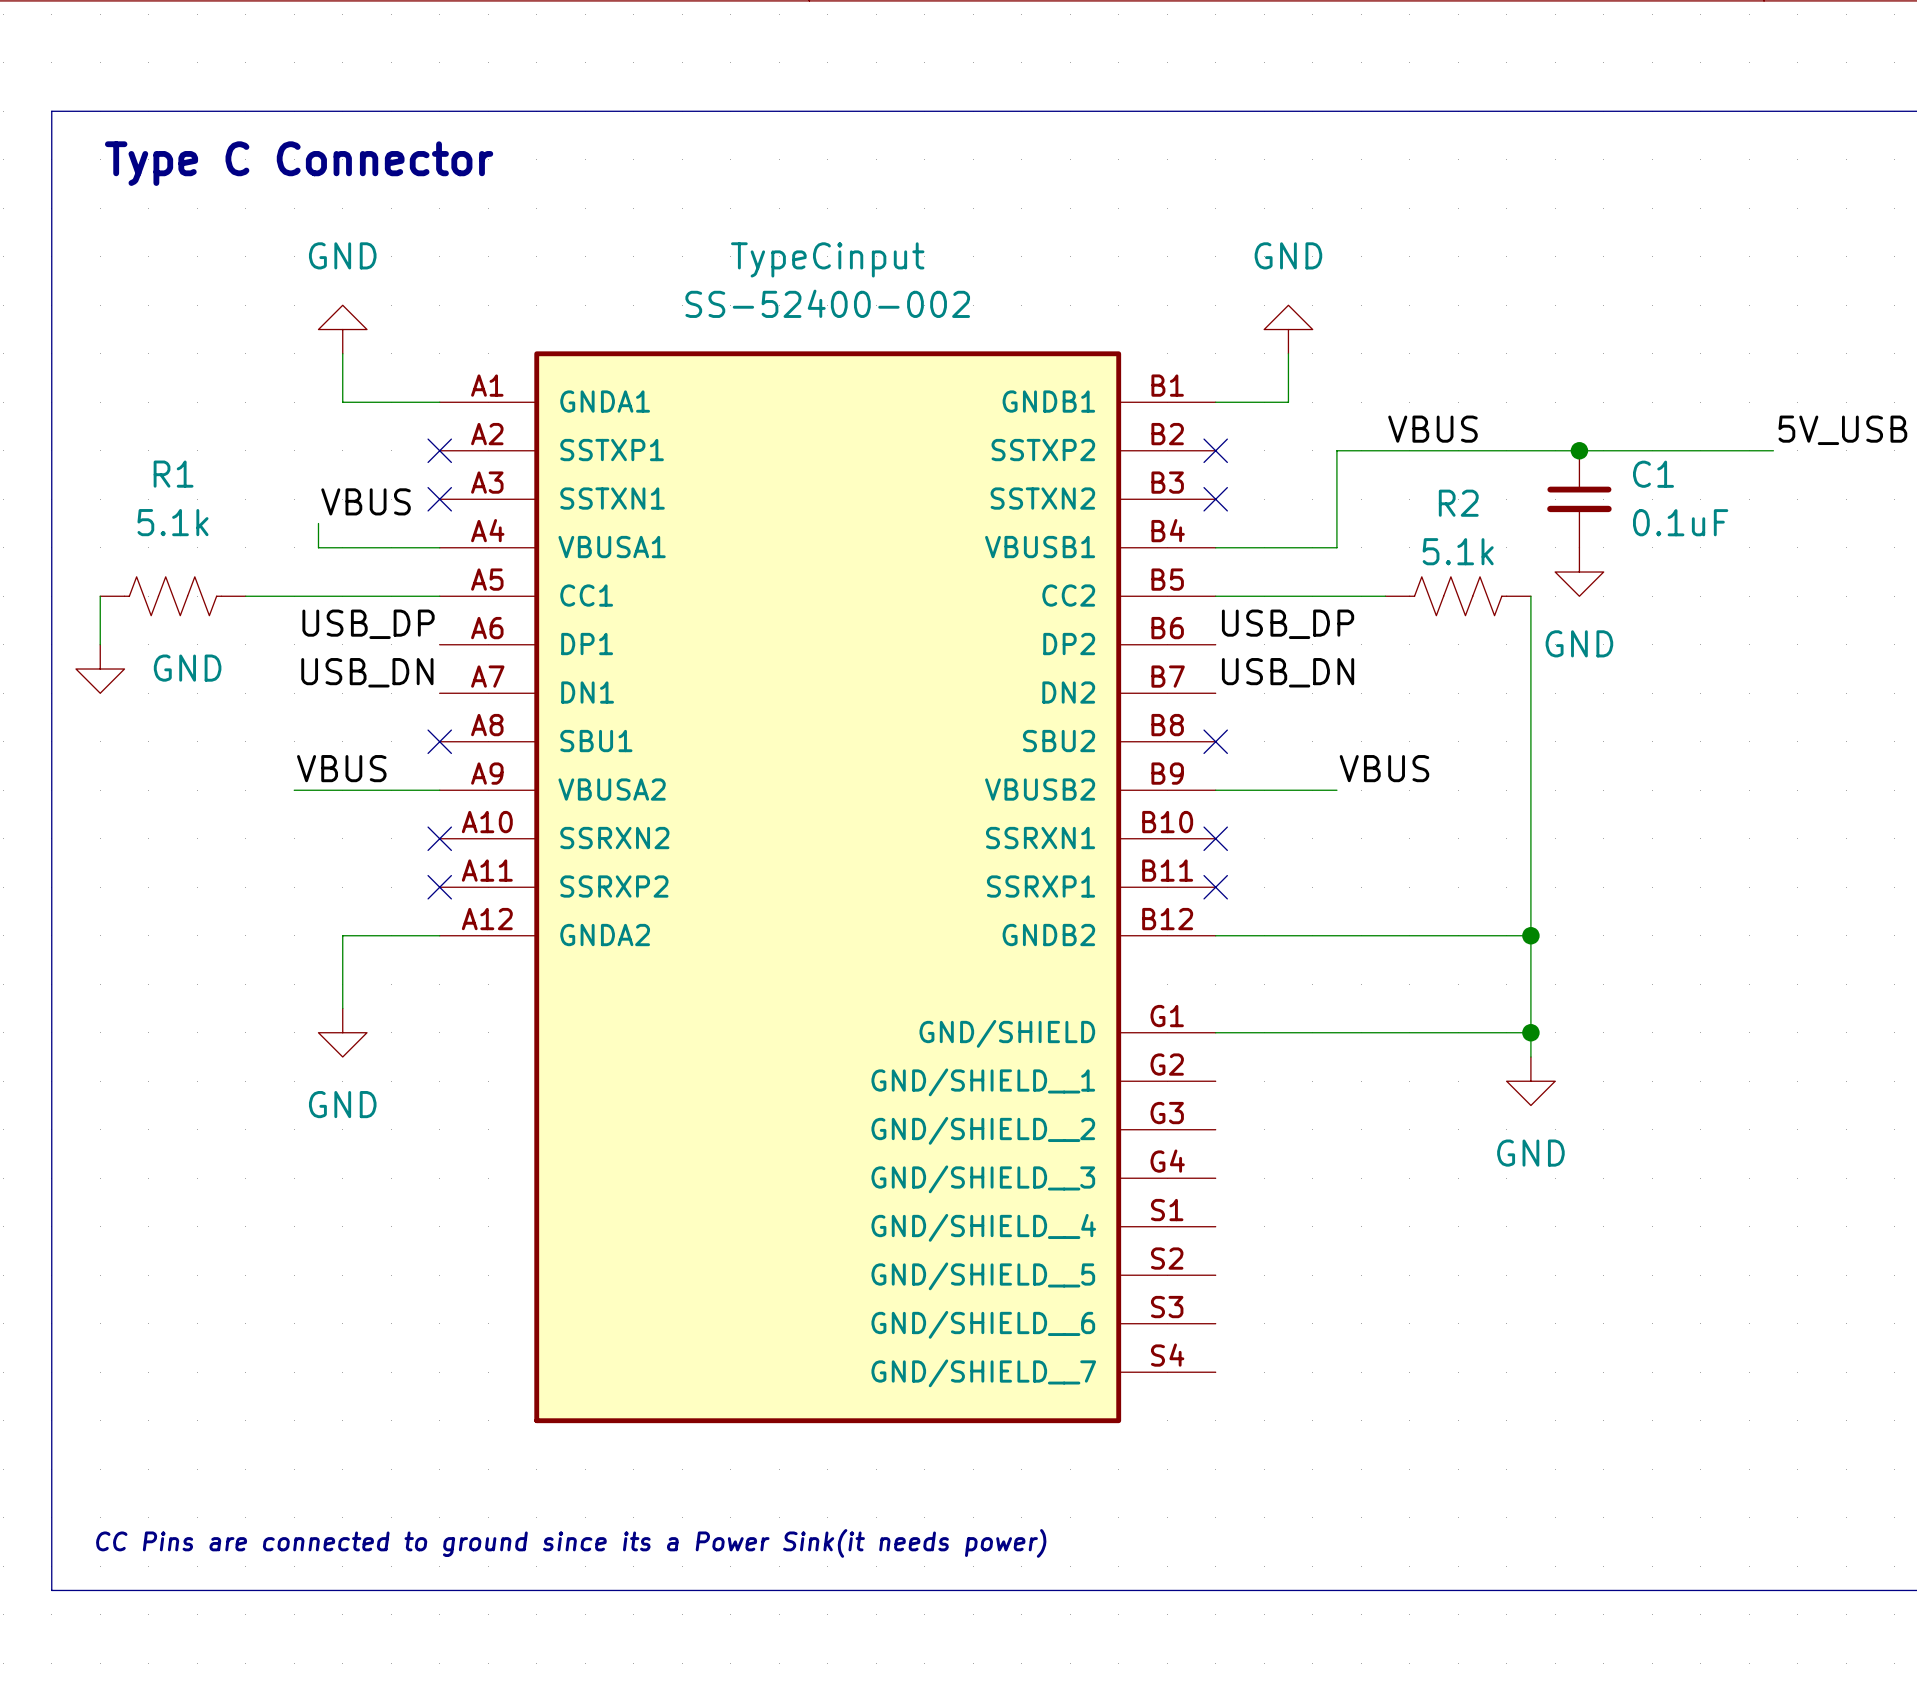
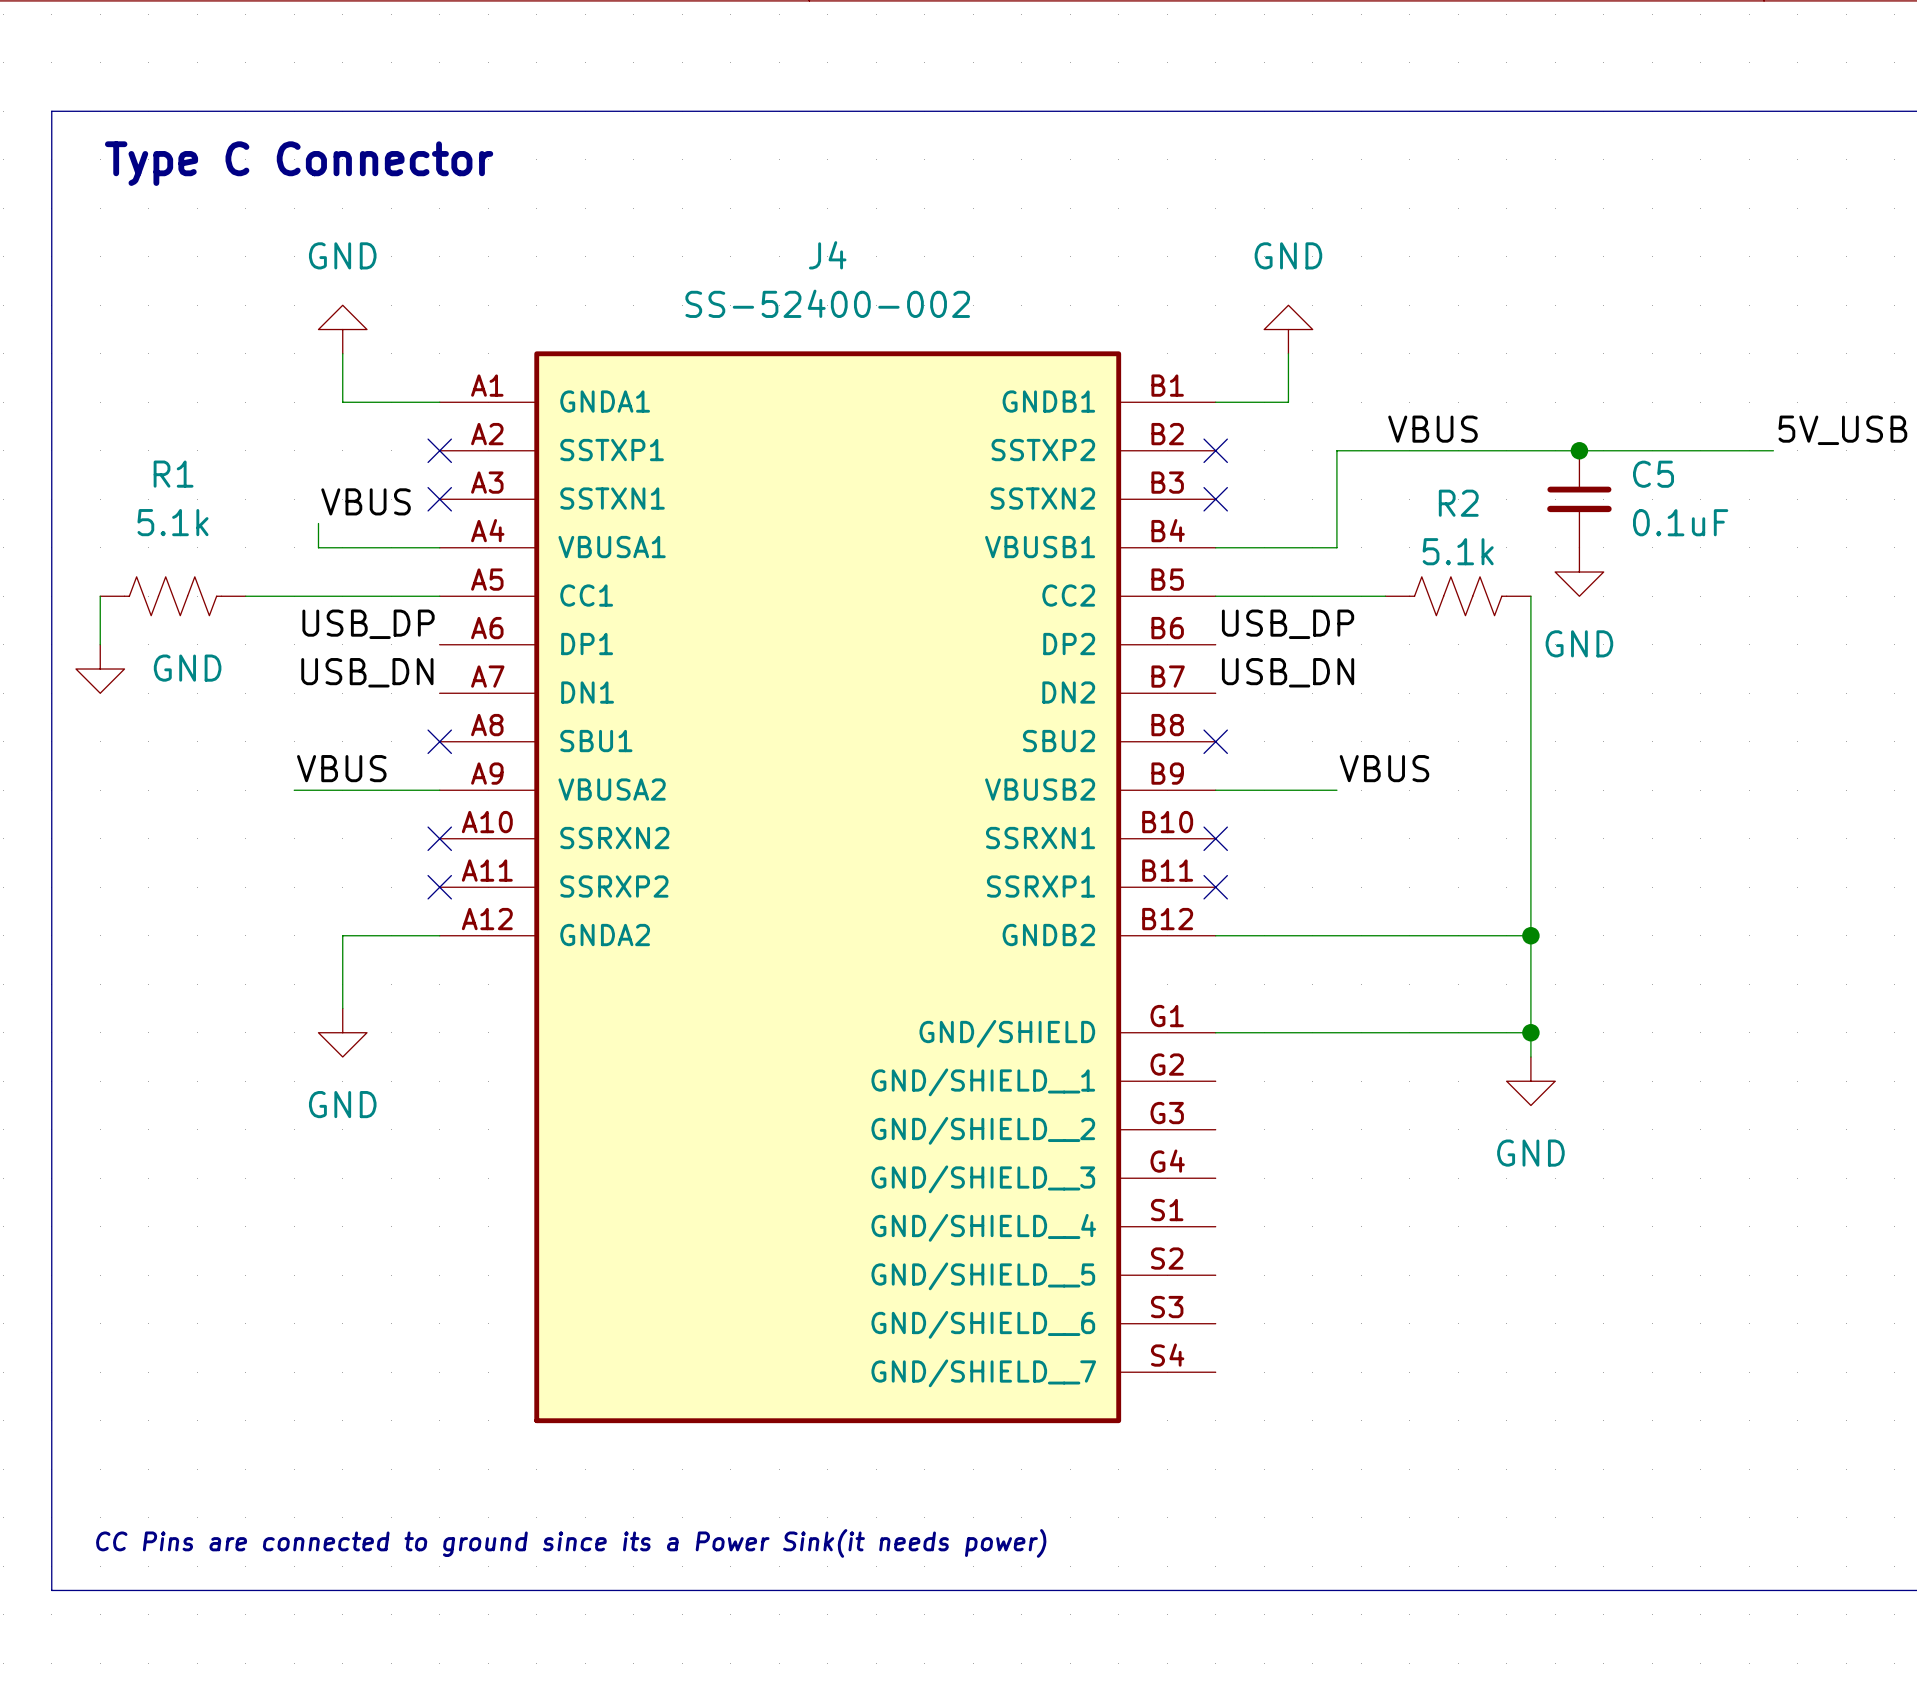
TypeCinput name: TypeCinput (827, 259) -> J4 (827, 255)
C1 name: C1 (1653, 474) -> C5 (1653, 474)

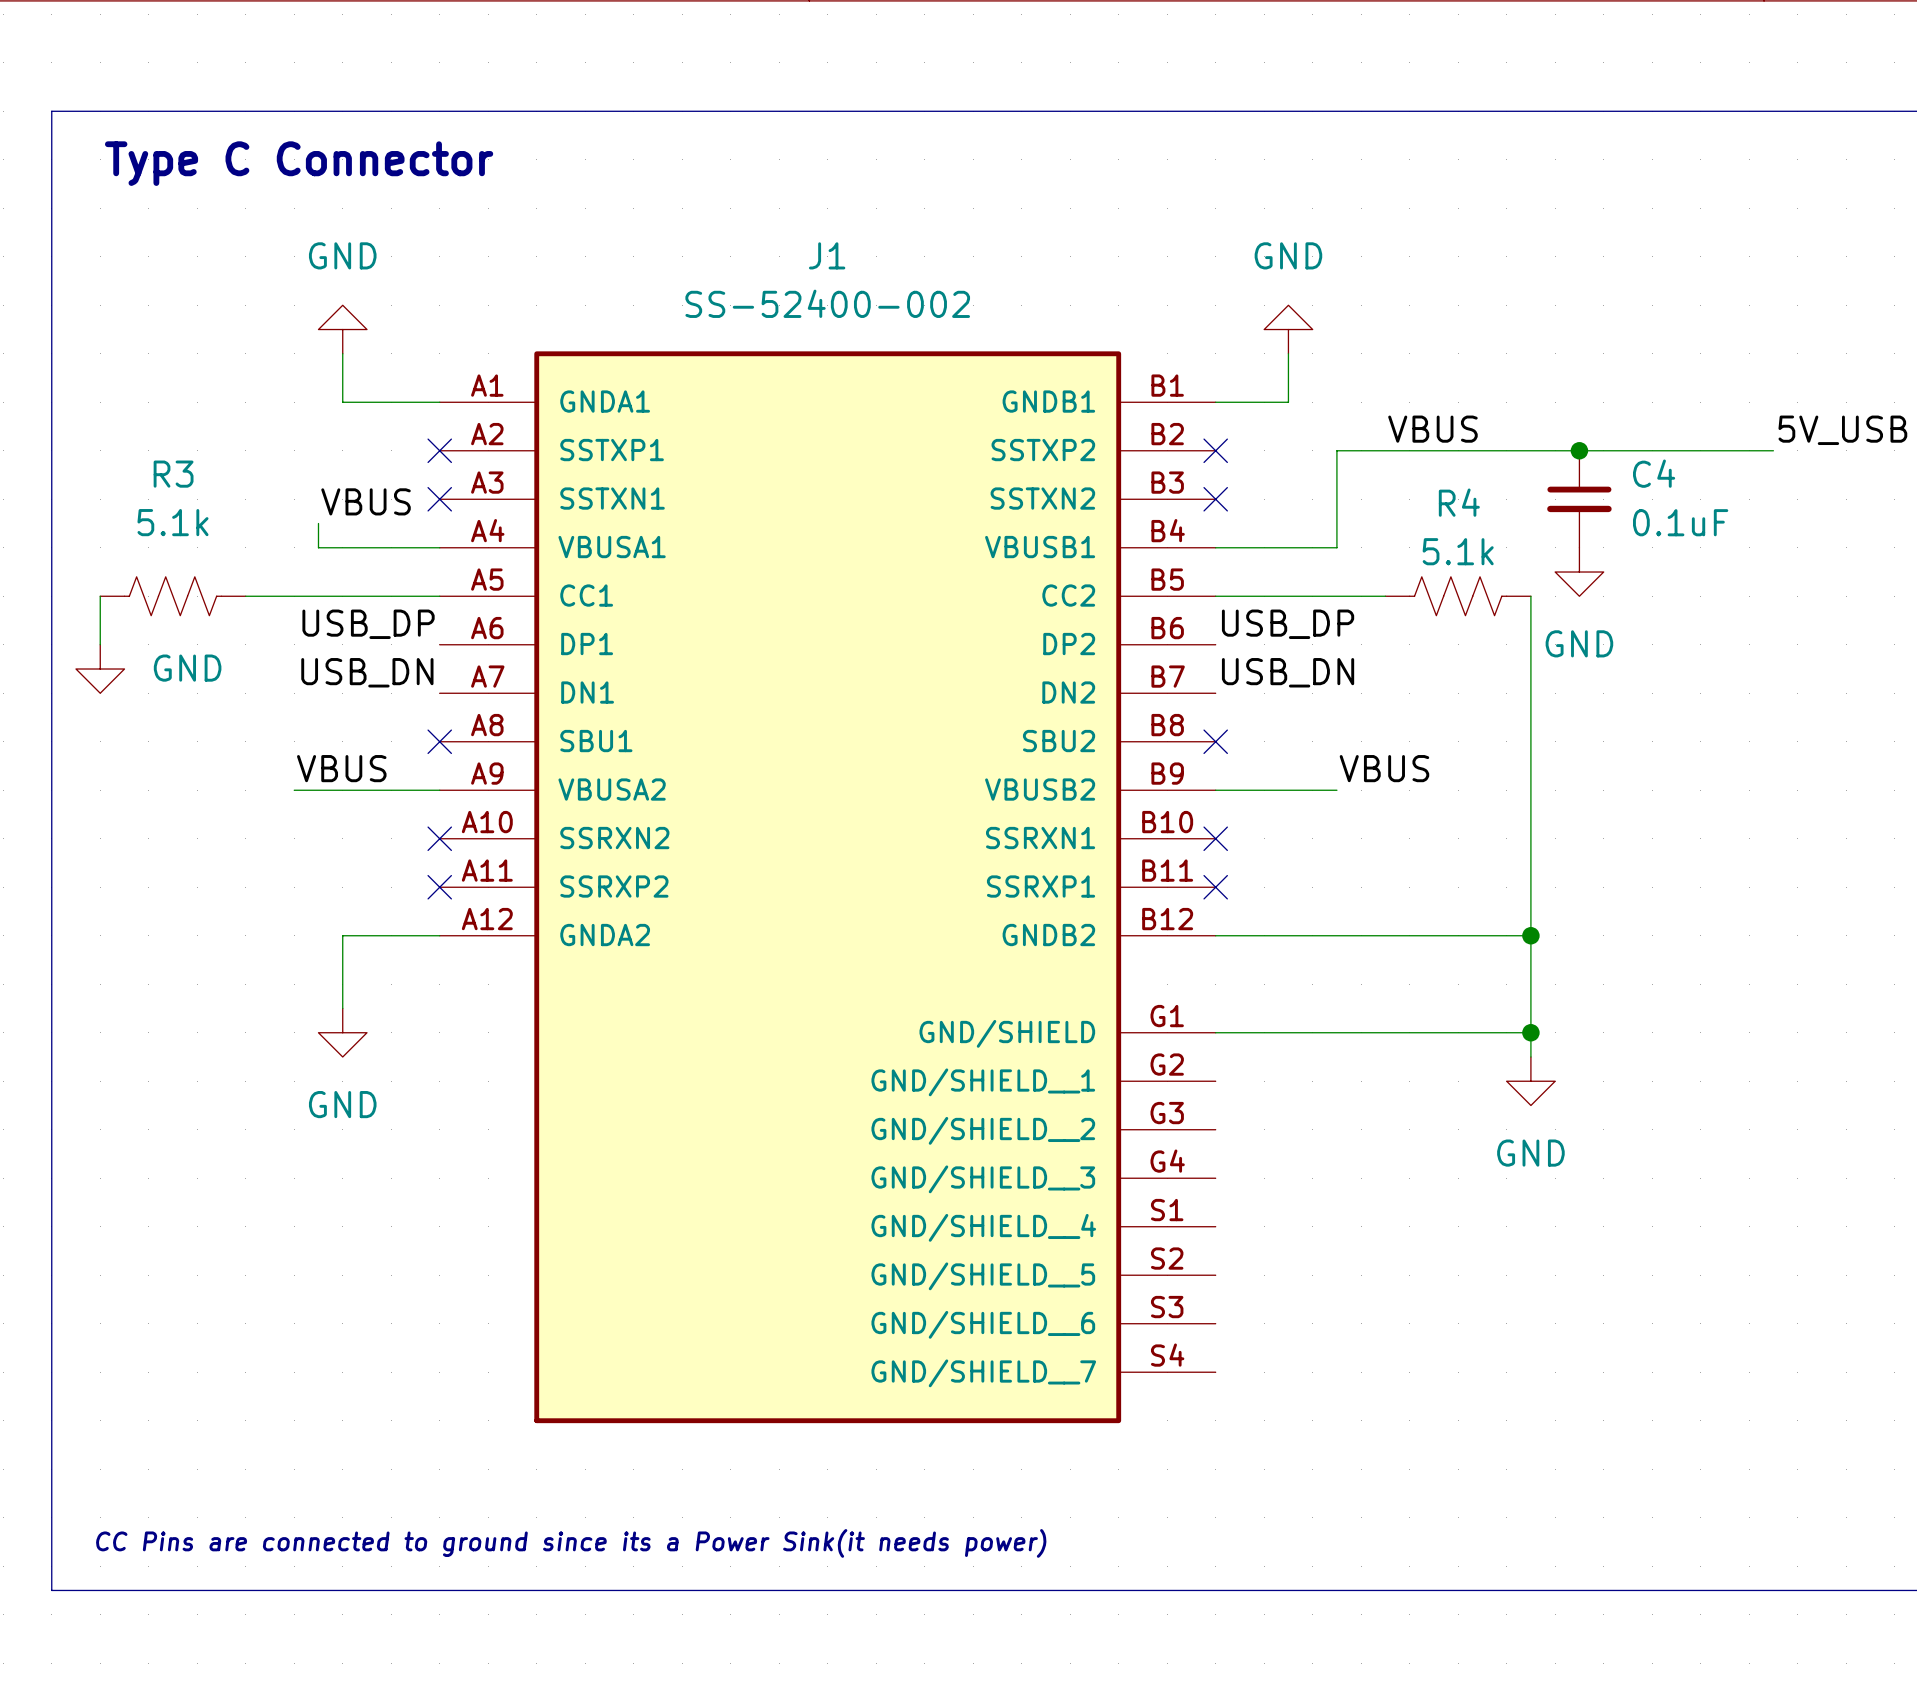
J4 name: J4 (827, 255) -> J1 (827, 255)
R1 name: R1 (173, 474) -> R3 (173, 474)
C5 name: C5 (1653, 474) -> C4 (1654, 473)
R2 name: R2 (1458, 503) -> R4 (1459, 502)

